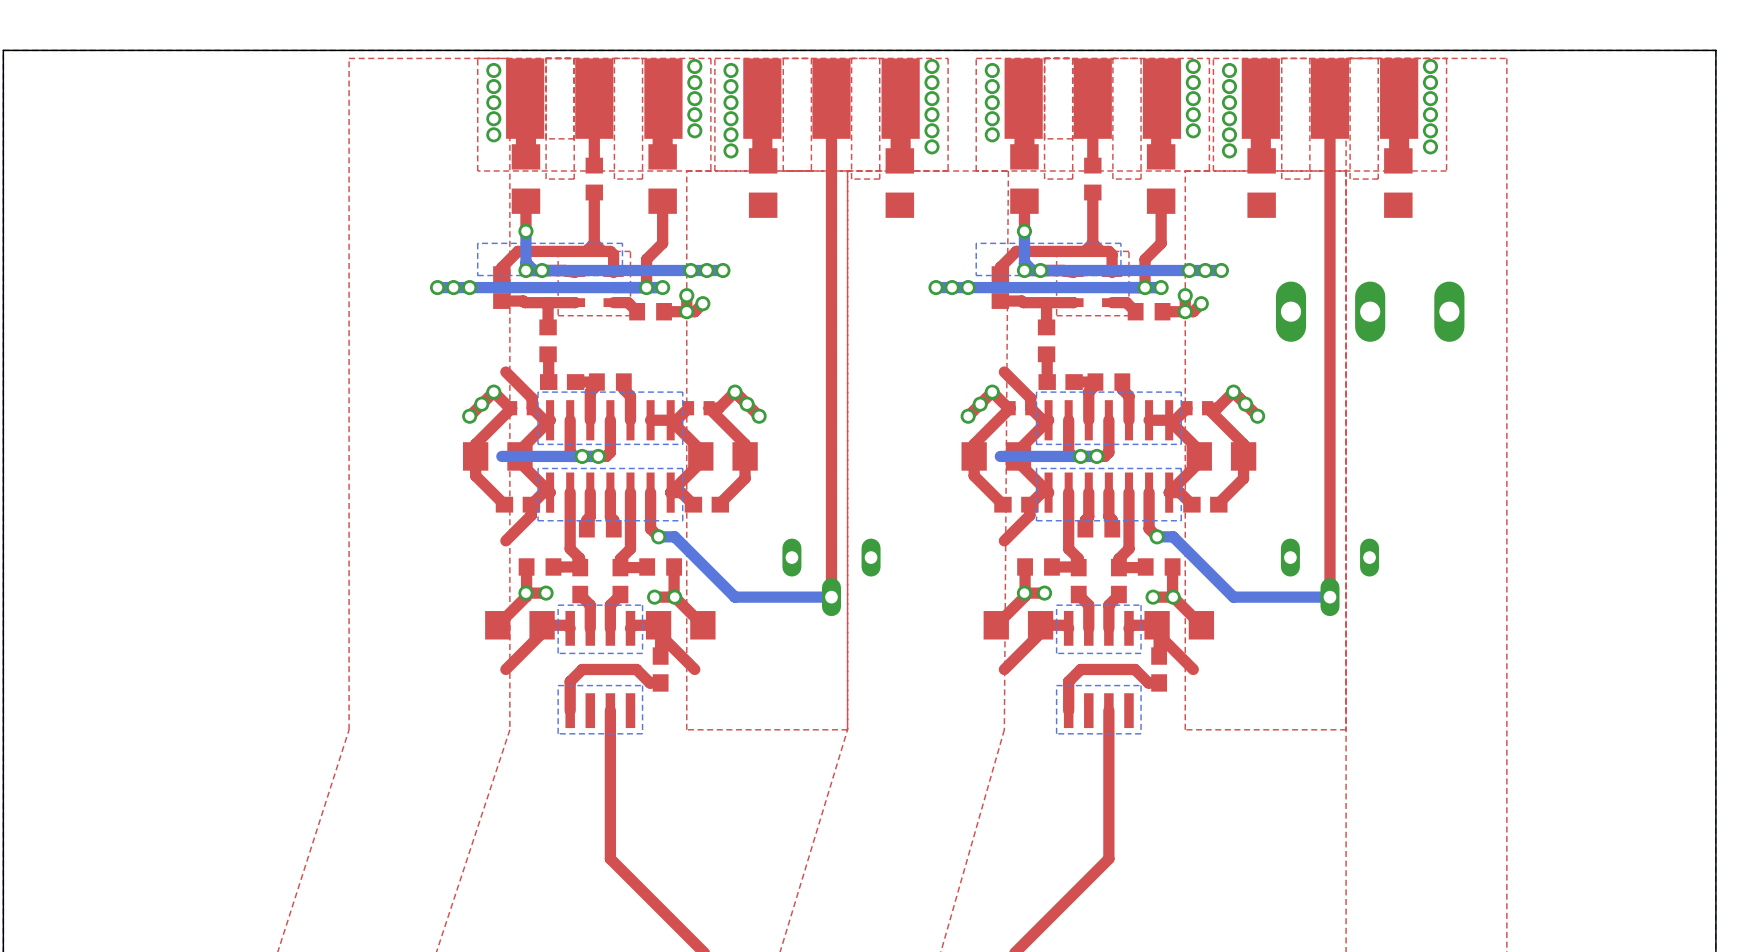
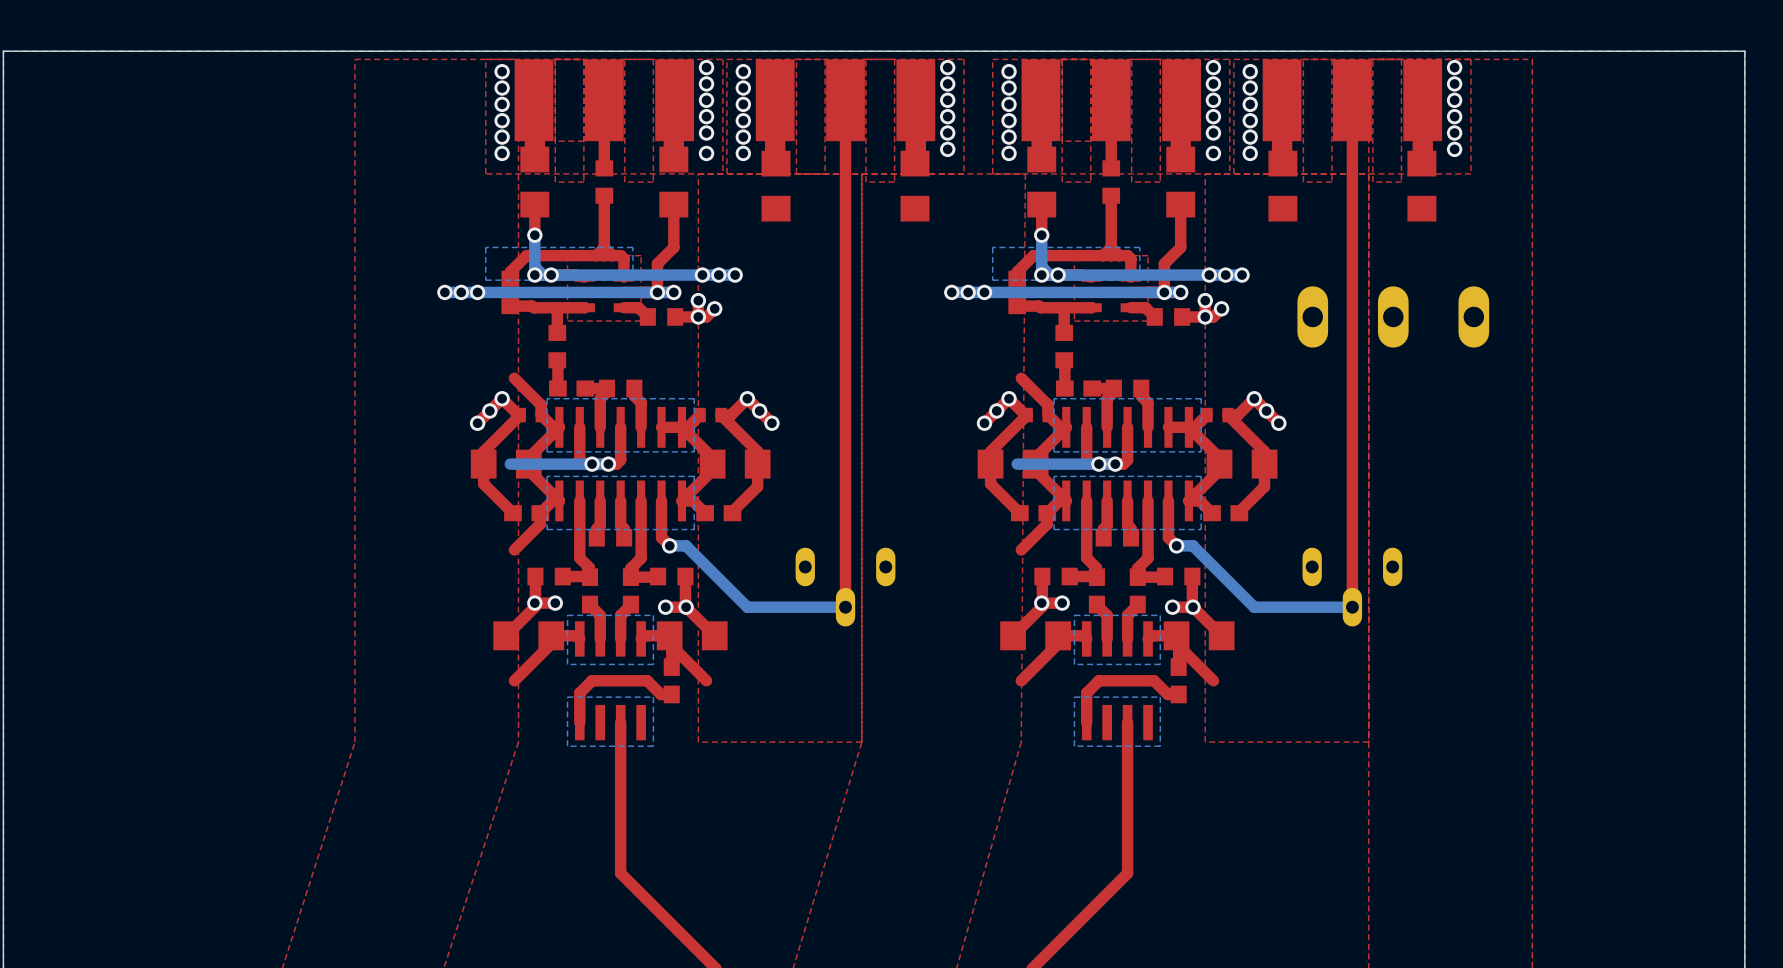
via: none -> (502, 153)
via: none -> (706, 153)
via: none -> (1009, 153)
via: none -> (1213, 153)

